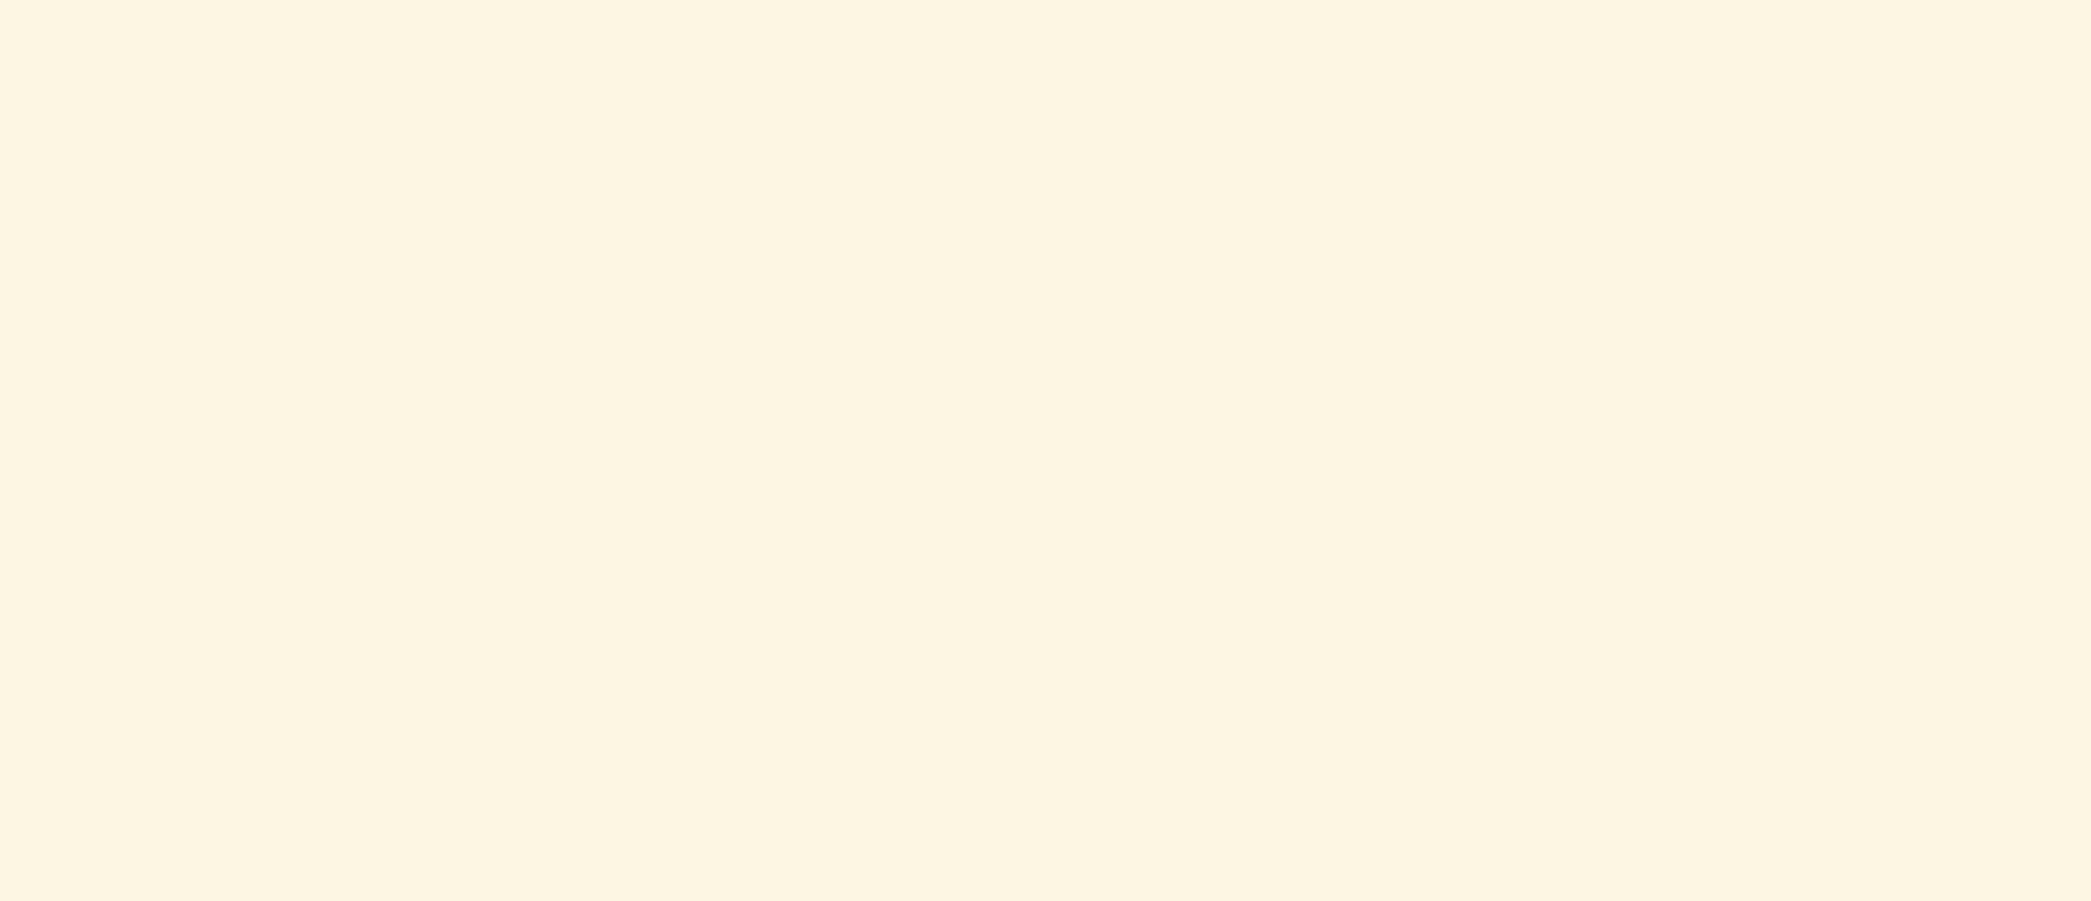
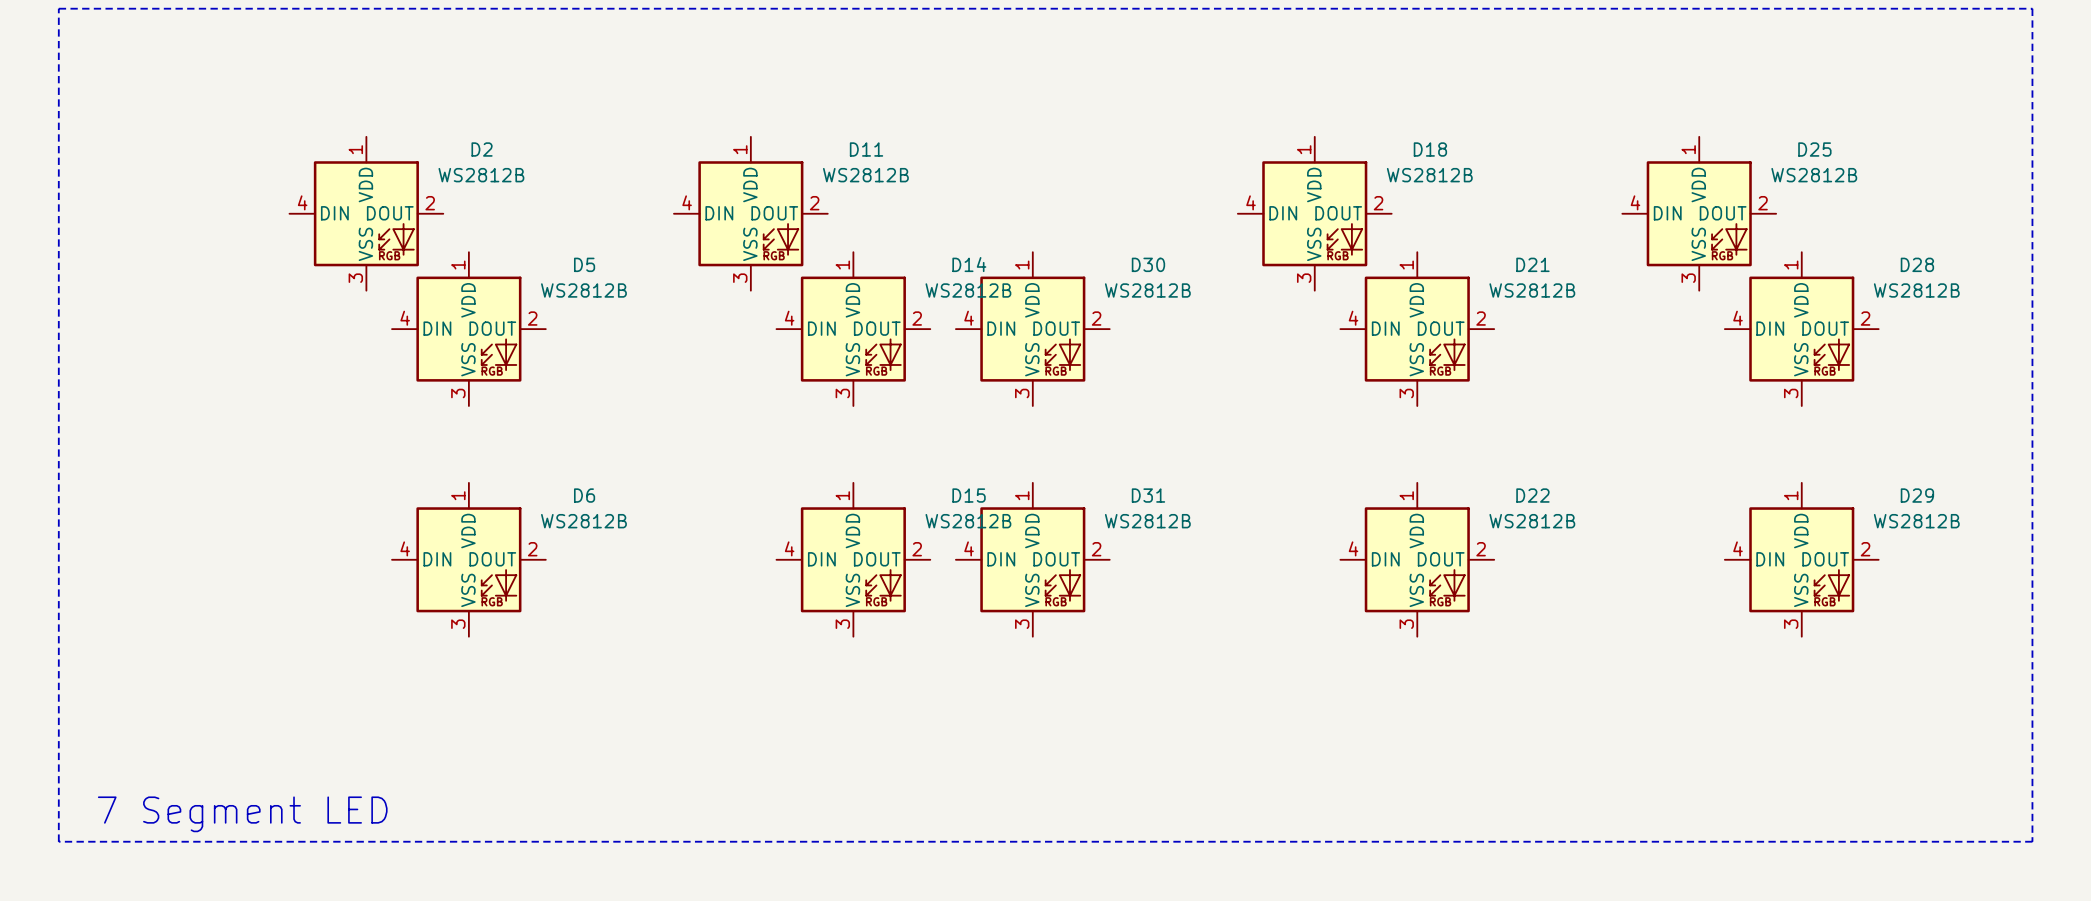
line: none -> (58, 8) (2032, 8) (2032, 841) (58, 841) (58, 8)
D2: none -> WS2812B (366, 213)
D11: none -> WS2812B (750, 213)
D18: none -> WS2812B (1314, 213)
D25: none -> WS2812B (1699, 213)
D5: none -> WS2812B (468, 329)
D14: none -> WS2812B (853, 329)
D30: none -> WS2812B (1032, 329)
D21: none -> WS2812B (1417, 329)
D28: none -> WS2812B (1801, 329)
D6: none -> WS2812B (468, 559)
D15: none -> WS2812B (853, 559)
D31: none -> WS2812B (1032, 559)
D22: none -> WS2812B (1417, 559)
D29: none -> WS2812B (1801, 559)
text: none -> 7 Segment LED (242, 814)

